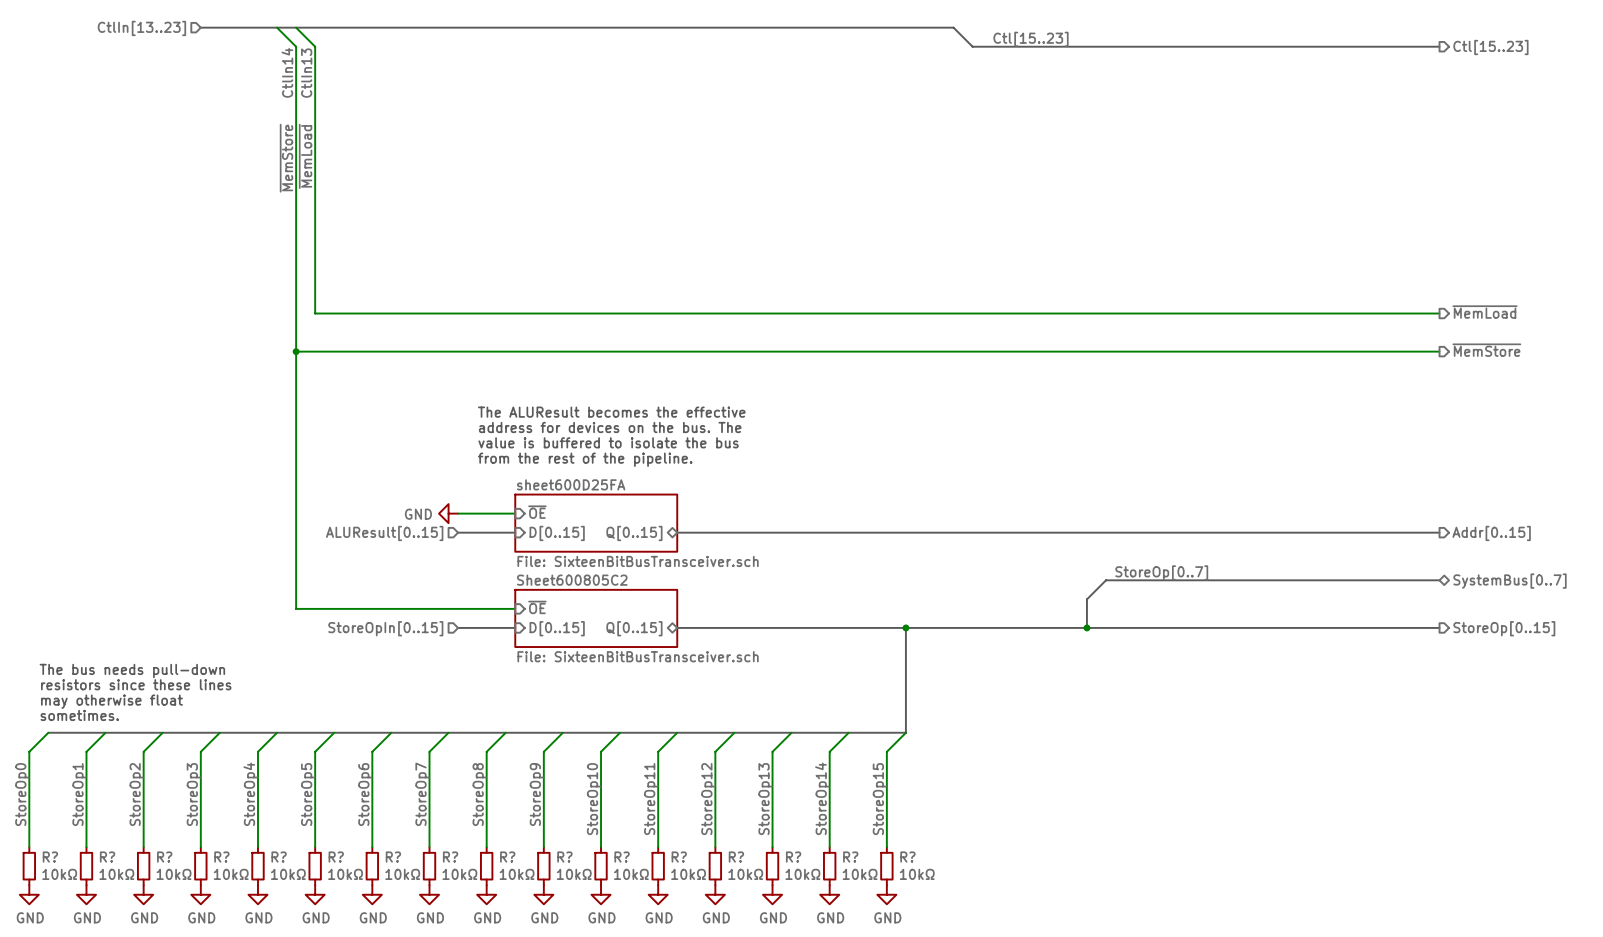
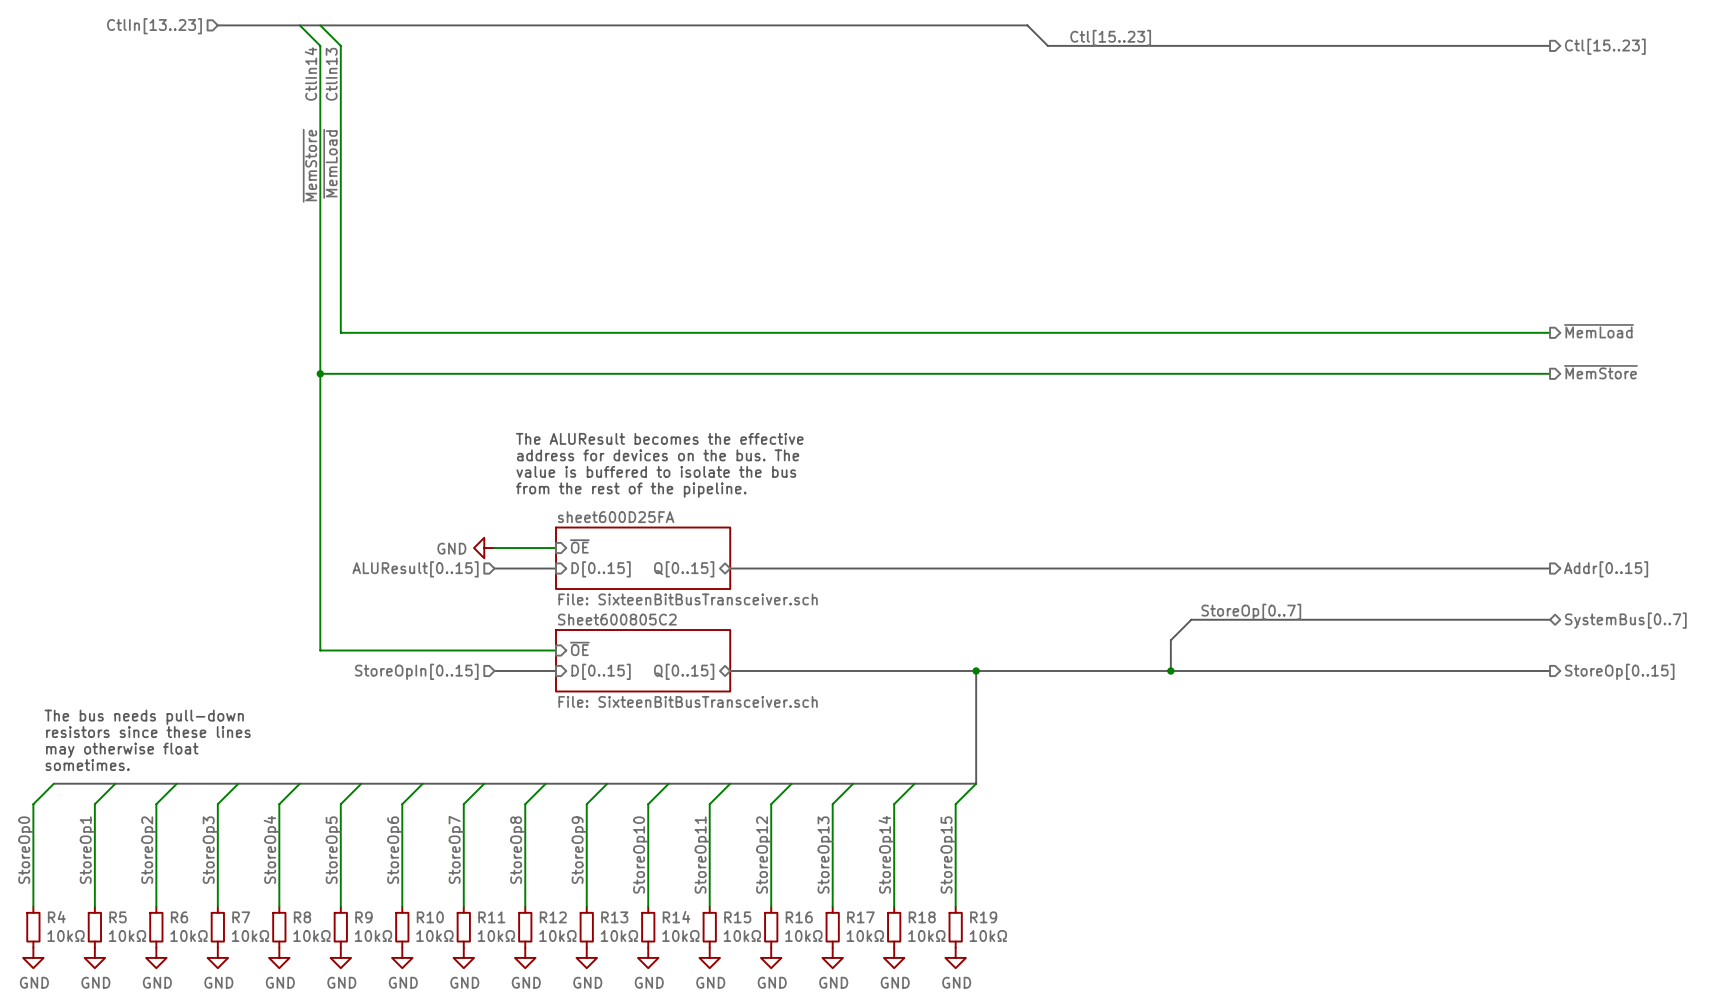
R? name: R? (50, 857) -> R4 (56, 917)
R? name: R? (107, 857) -> R5 (118, 917)
R? name: R? (164, 857) -> R6 (179, 917)
R? name: R? (221, 857) -> R7 (241, 917)
R? name: R? (279, 857) -> R8 (302, 917)
R? name: R? (336, 857) -> R9 (363, 917)
R? name: R? (393, 857) -> R10 (430, 917)
R? name: R? (450, 857) -> R11 (491, 917)
R? name: R? (507, 857) -> R12 (553, 917)
R? name: R? (564, 857) -> R13 (614, 917)
R? name: R? (622, 857) -> R14 (676, 917)
R? name: R? (679, 857) -> R15 (737, 917)
R? name: R? (736, 857) -> R16 (799, 917)
R? name: R? (793, 857) -> R17 (860, 917)
R? name: R? (850, 857) -> R18 (922, 917)
R? name: R? (907, 857) -> R19 (983, 917)

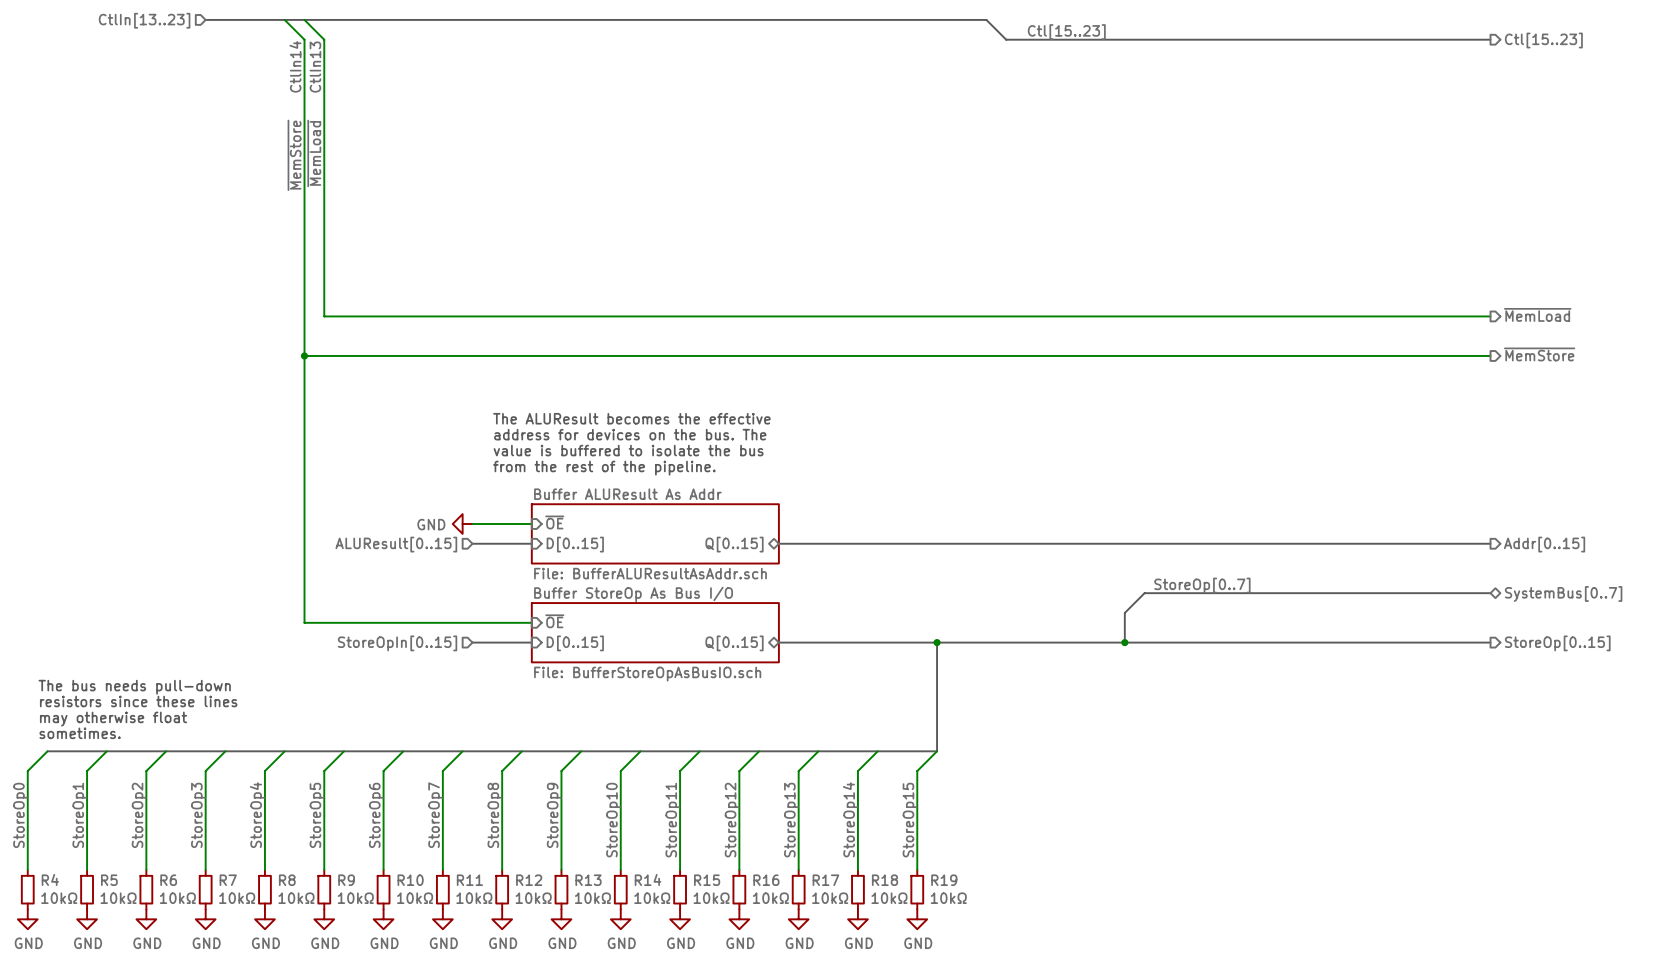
sheet sheet600D25FA: File: SixteenBitBusTransceiver.sch (643, 558) -> none
sheet Buffer ALUResult As Addr: none -> File: BufferALUResultAsAddr.sch (655, 533)
bus: (730, 568) (812, 568) -> none
sheet pin position: Q[0..15] (684, 569) -> Q[0..15] (734, 544)
sheet Sheet600805C2: File: SixteenBitBusTransceiver.sch (643, 660) -> none
sheet Buffer StoreOp As Bus I/O: none -> File: BufferStoreOpAsBusIO.sch (655, 632)
bus: (730, 670) (812, 670) -> none
sheet pin position: Q[0..15] (684, 671) -> Q[0..15] (734, 643)

